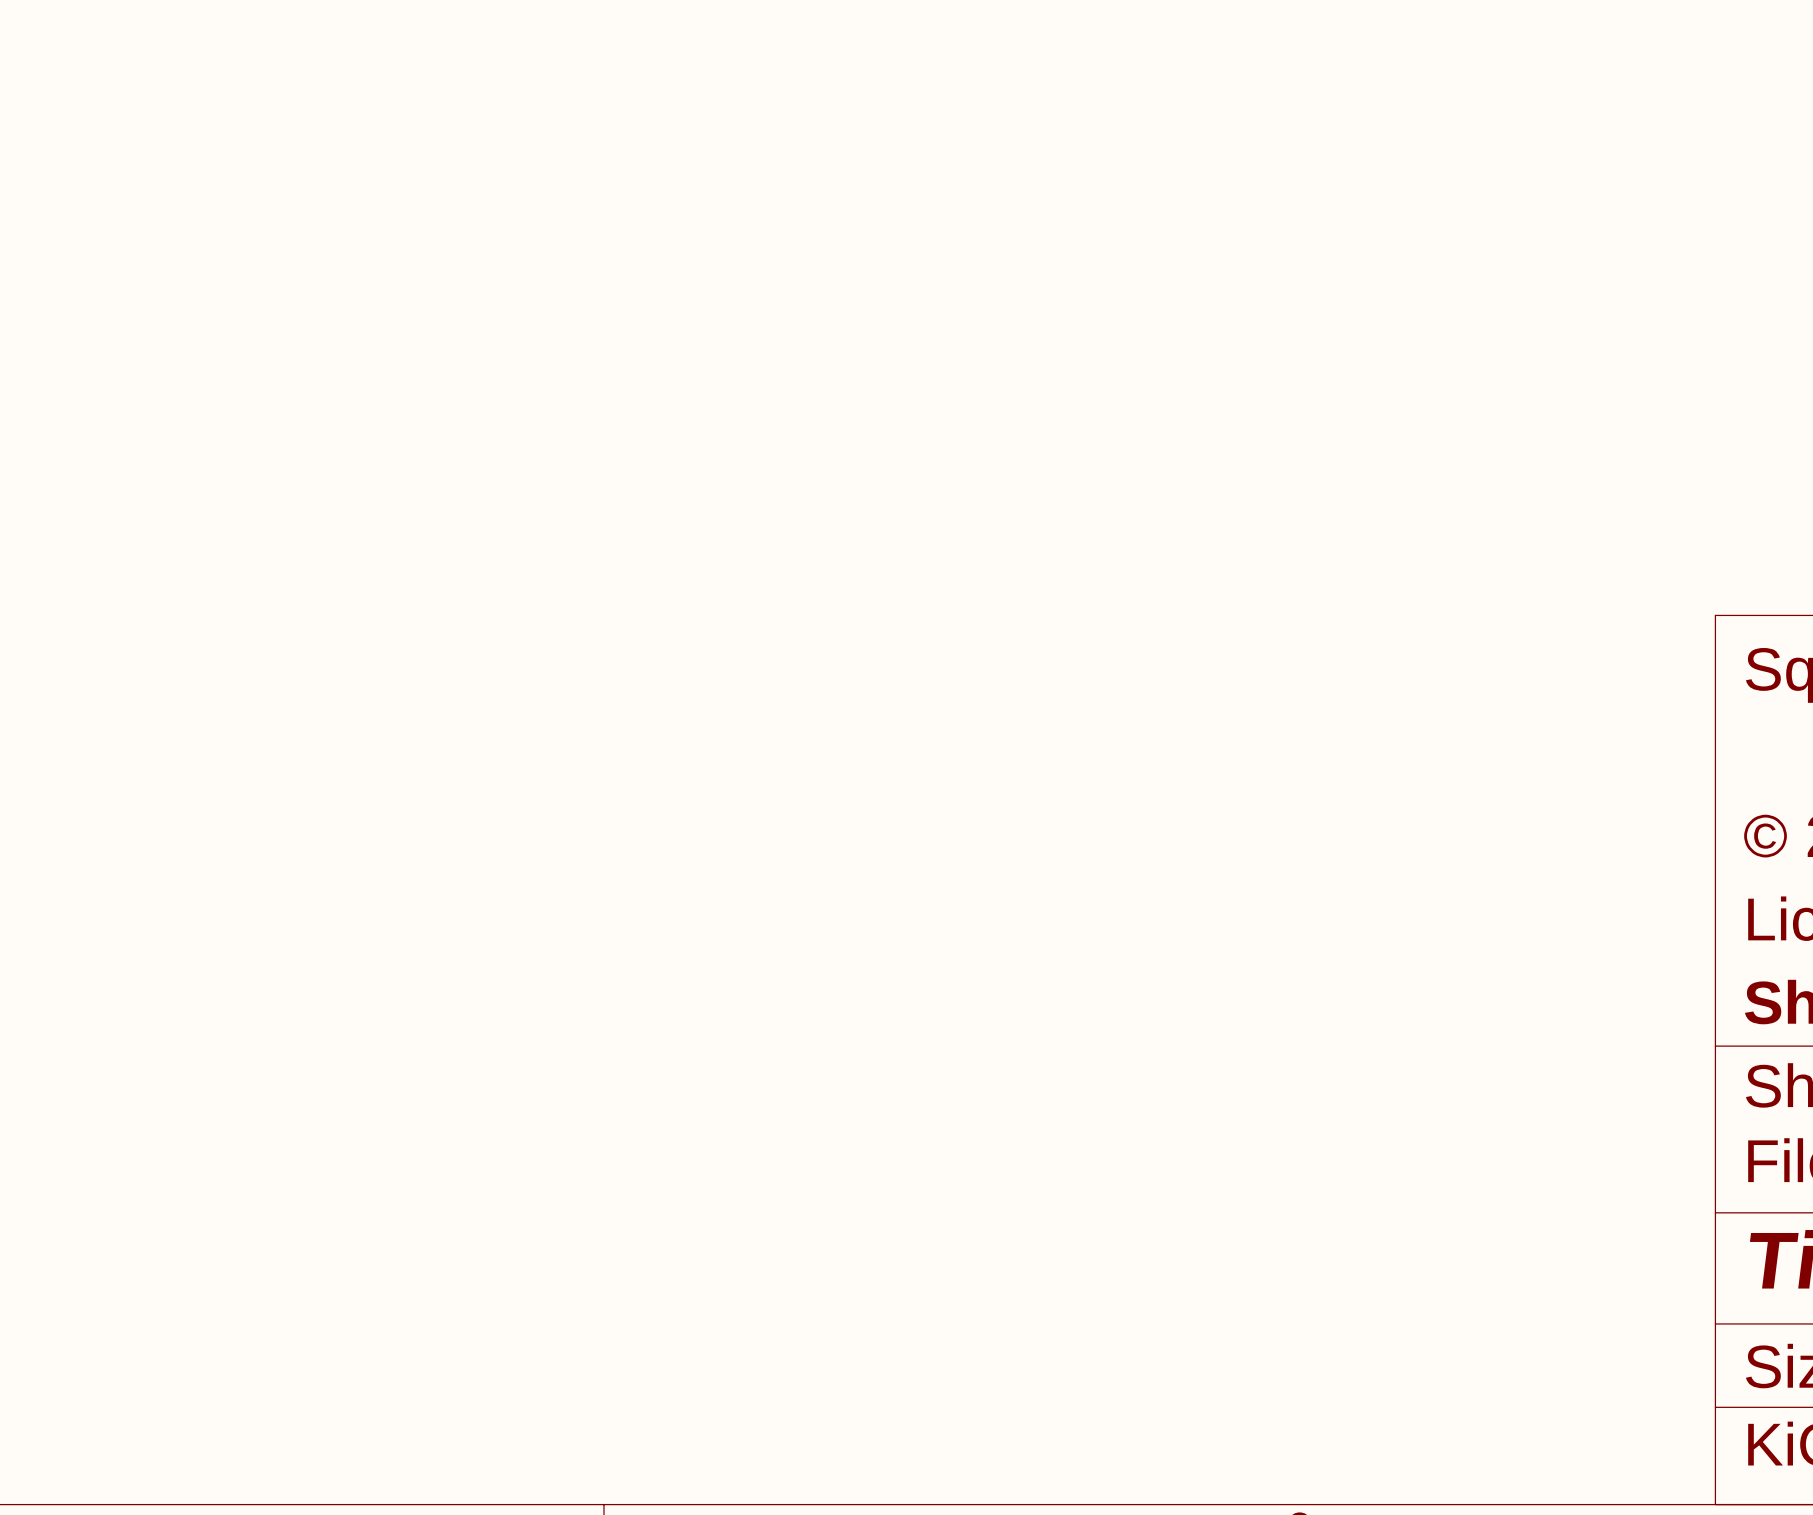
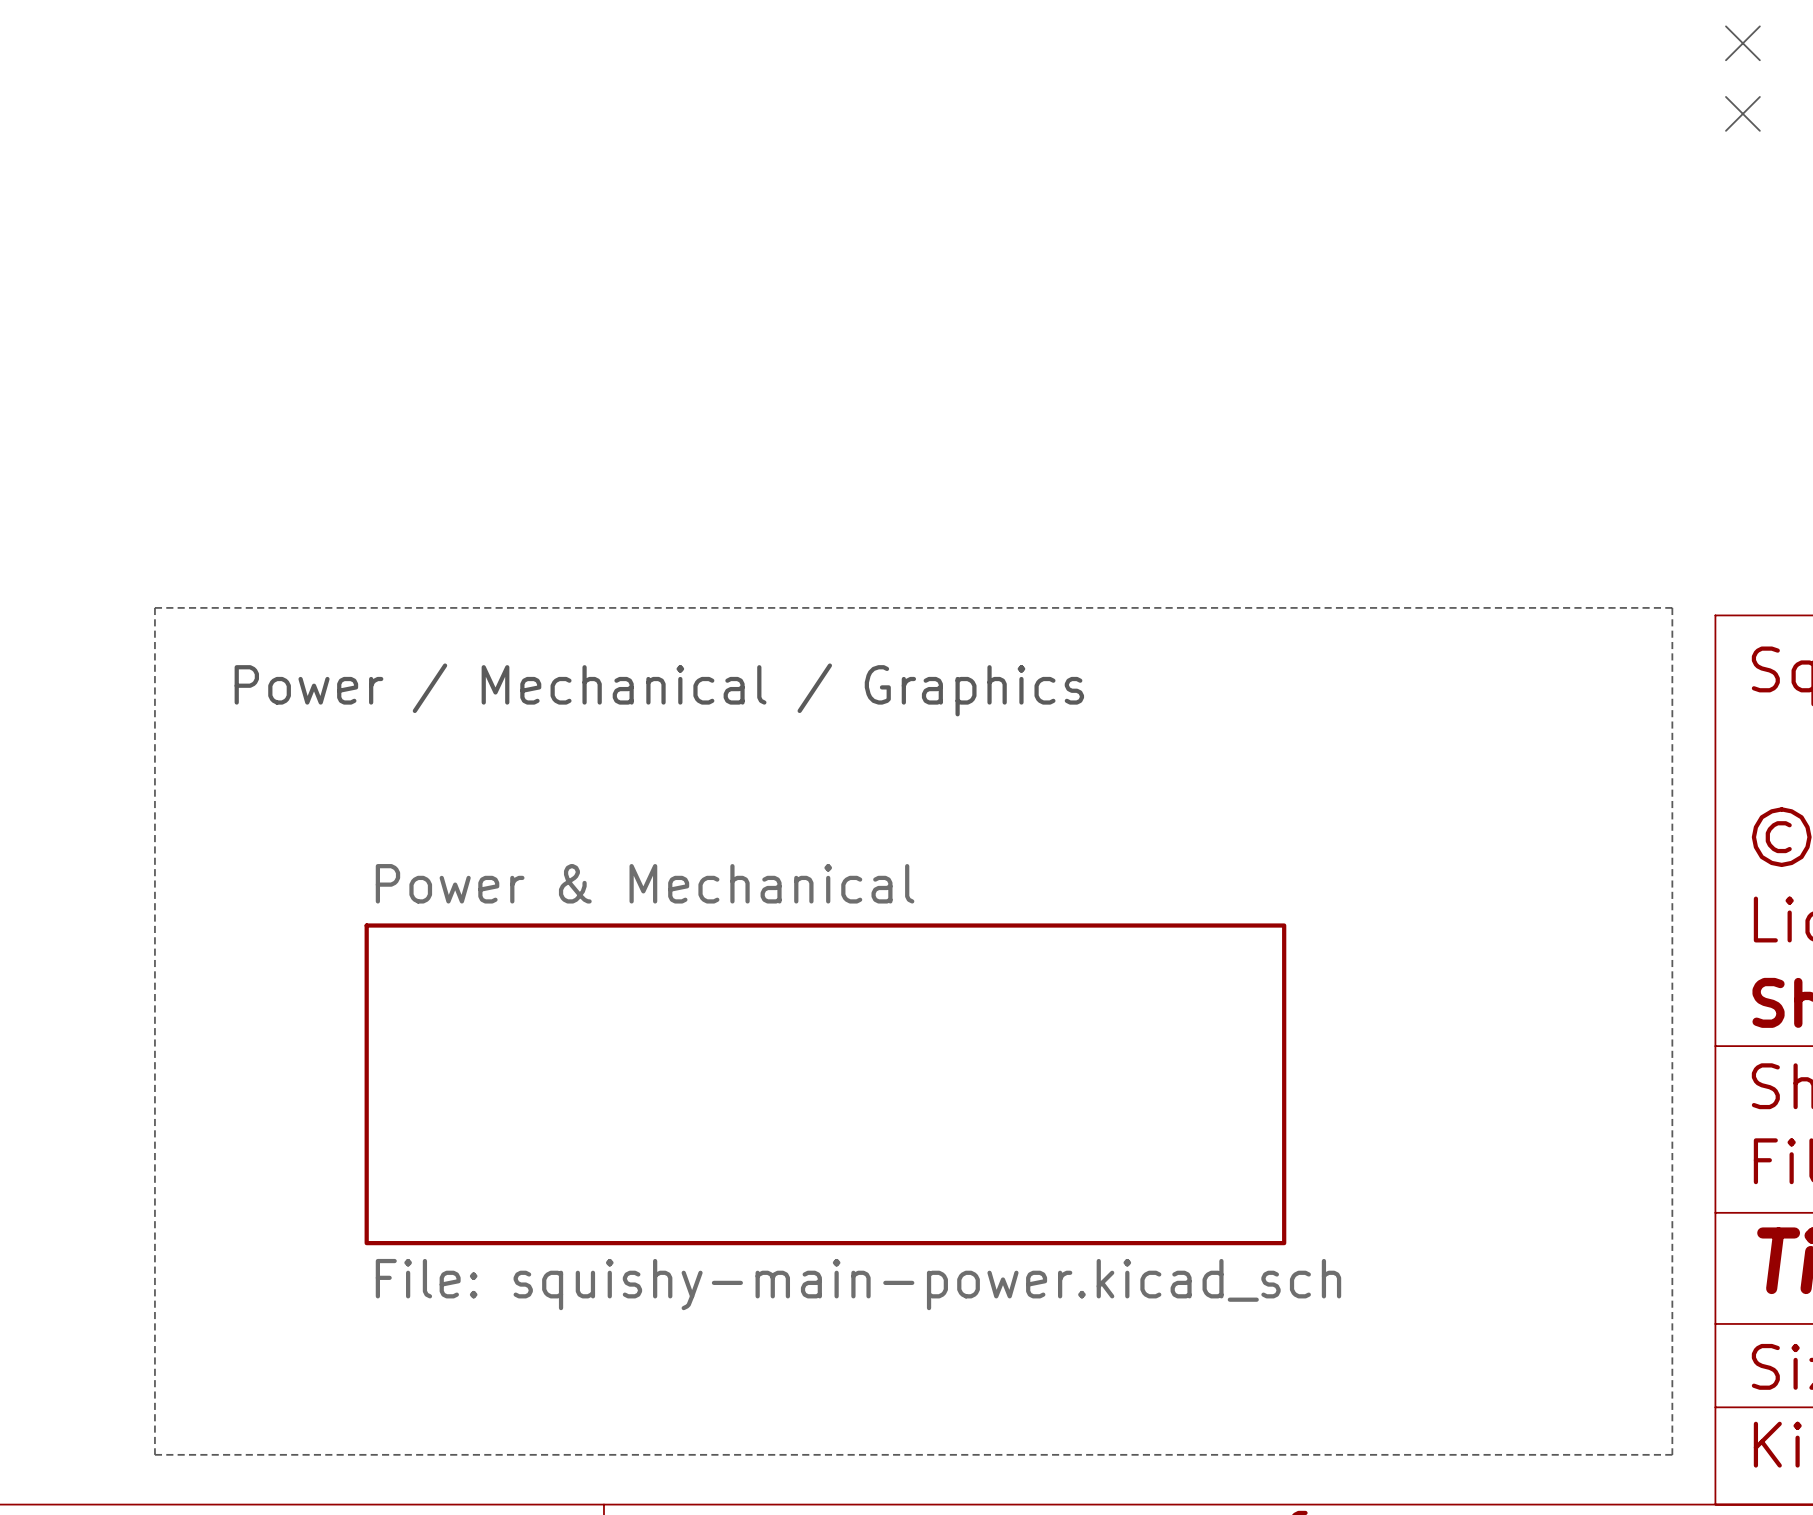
no-connect mark: none -> (1742, 43)
no-connect mark: none -> (1742, 113)
line: none -> (154, 607) (1672, 607) (1672, 1454) (154, 1454) (154, 607)
text: none -> Power / Mechanical / Graphics (659, 689)
sheet Power & Mechanical: none -> File: squishy-main-power.kicad_sch (825, 1084)

